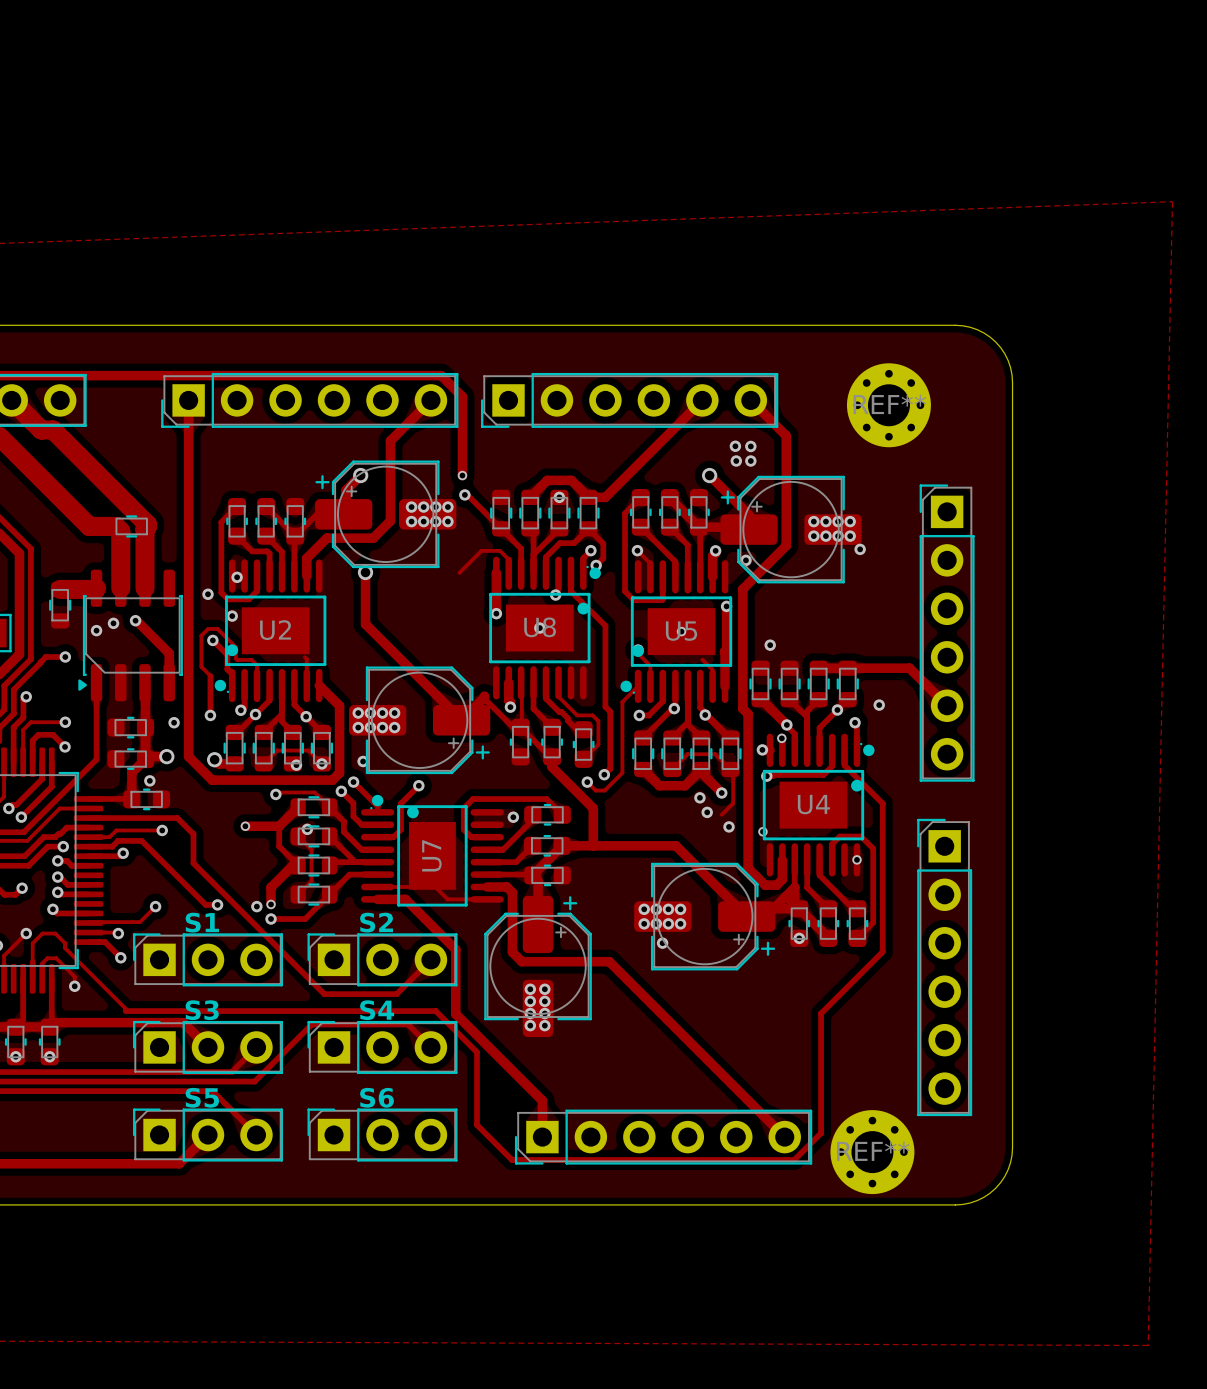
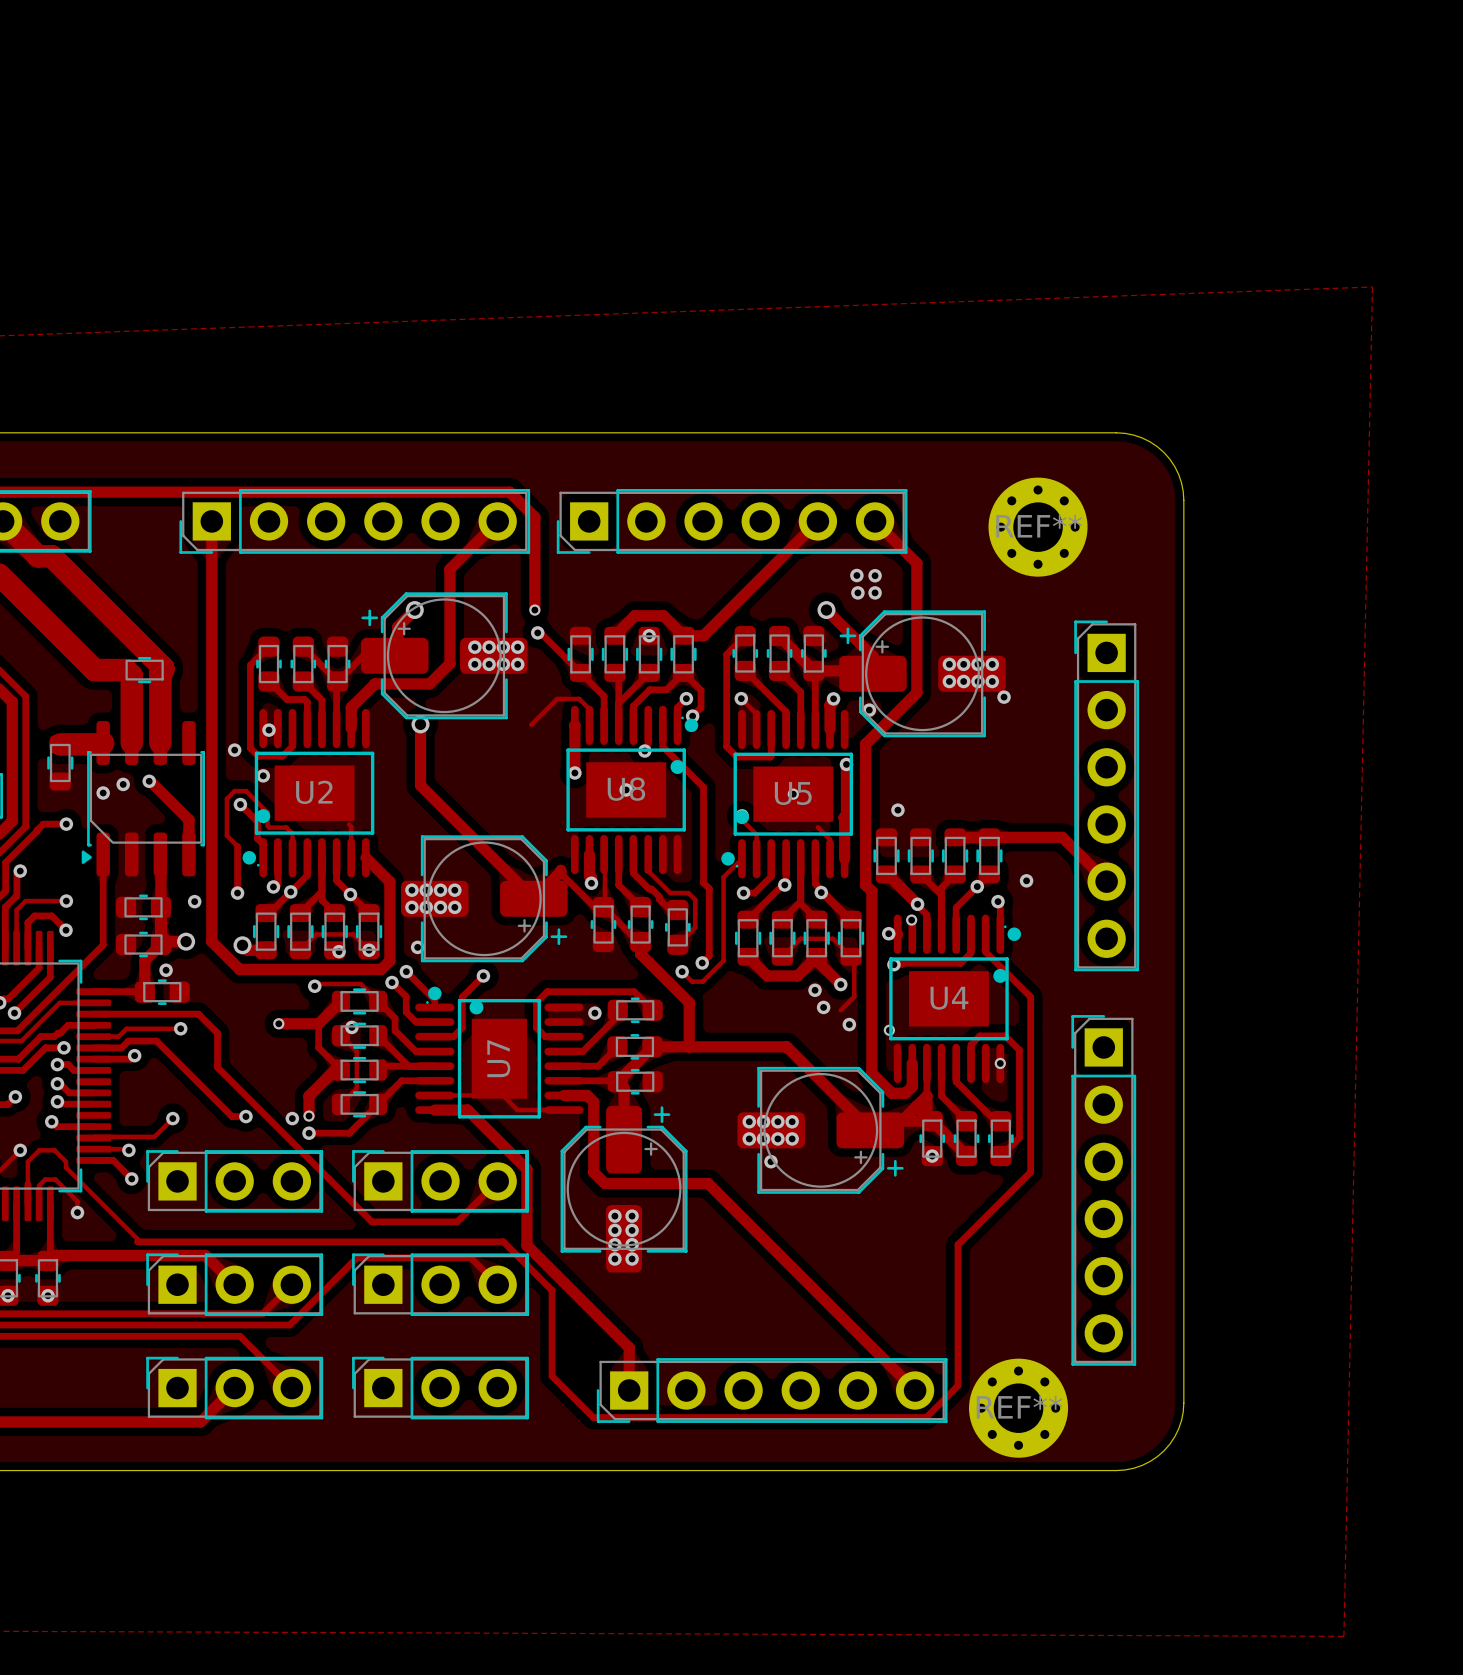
text: S1 (202, 922) -> none
text: S2 (376, 922) -> none
text: S3 (202, 1010) -> none
text: S4 (377, 1010) -> none
text: S5 (202, 1097) -> none
text: S6 (377, 1097) -> none

